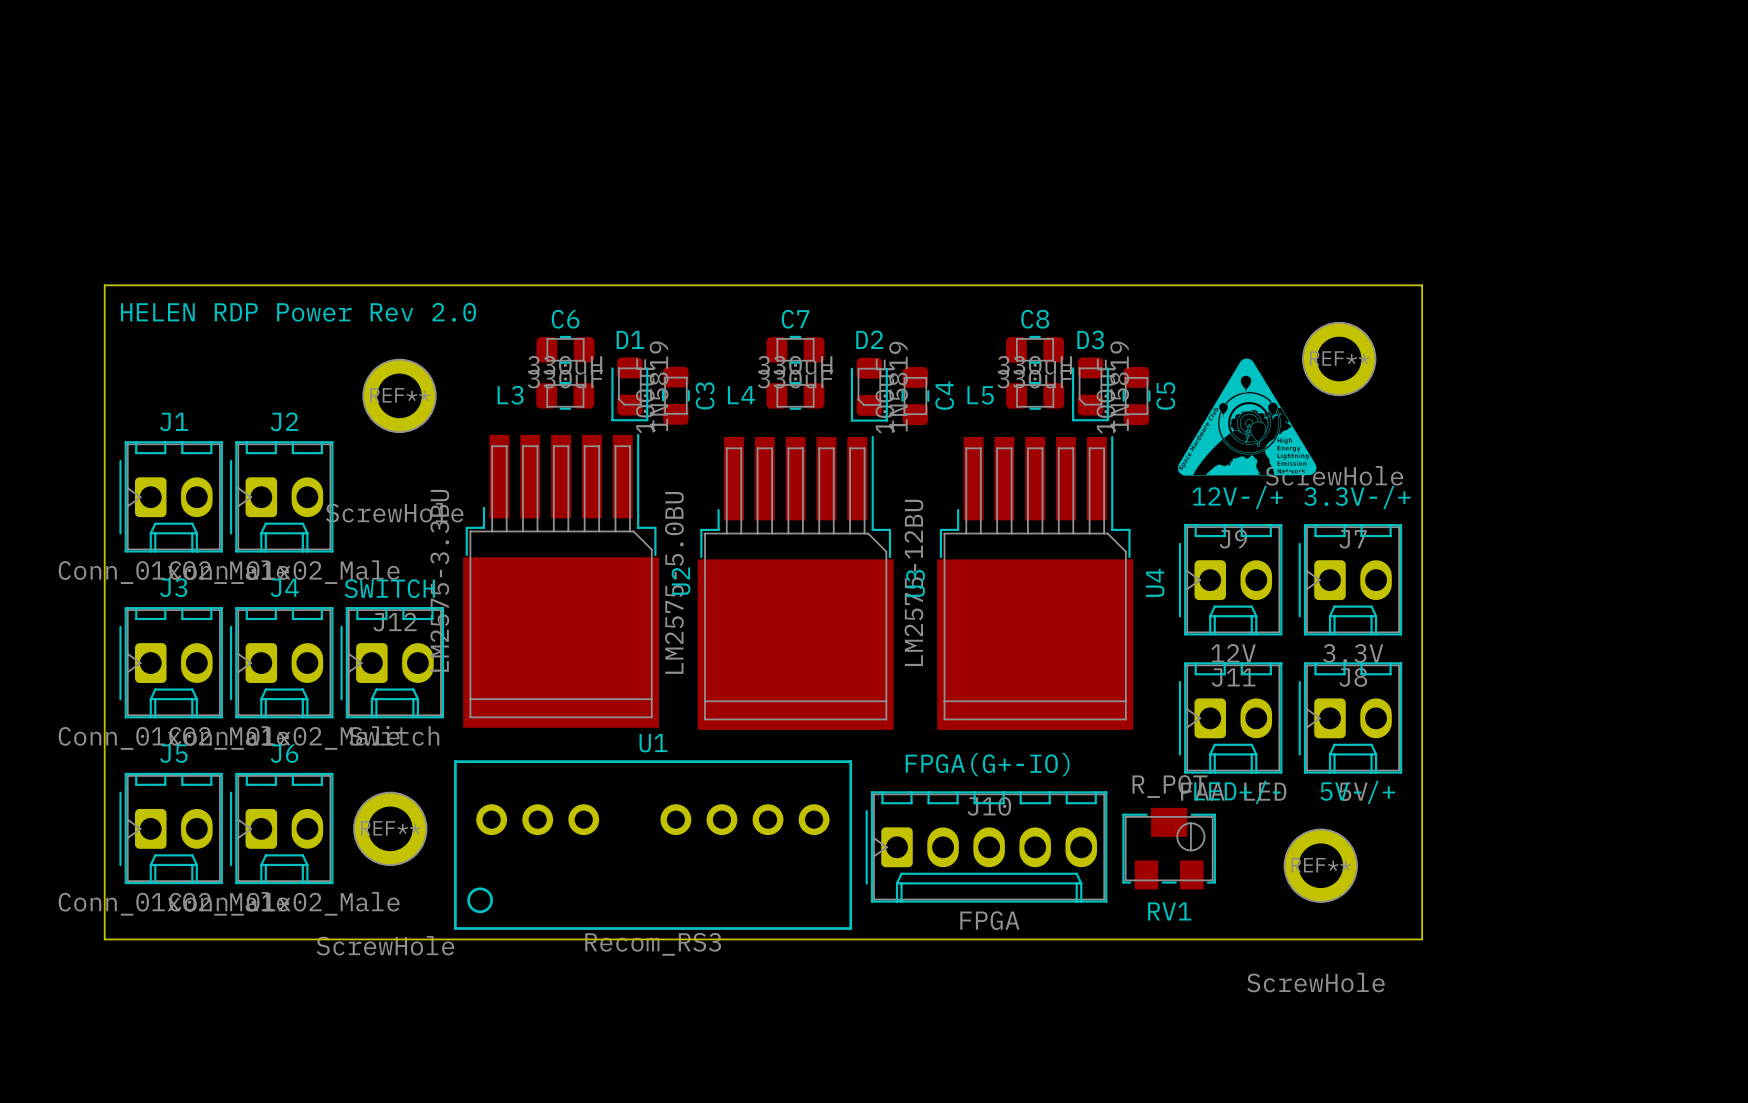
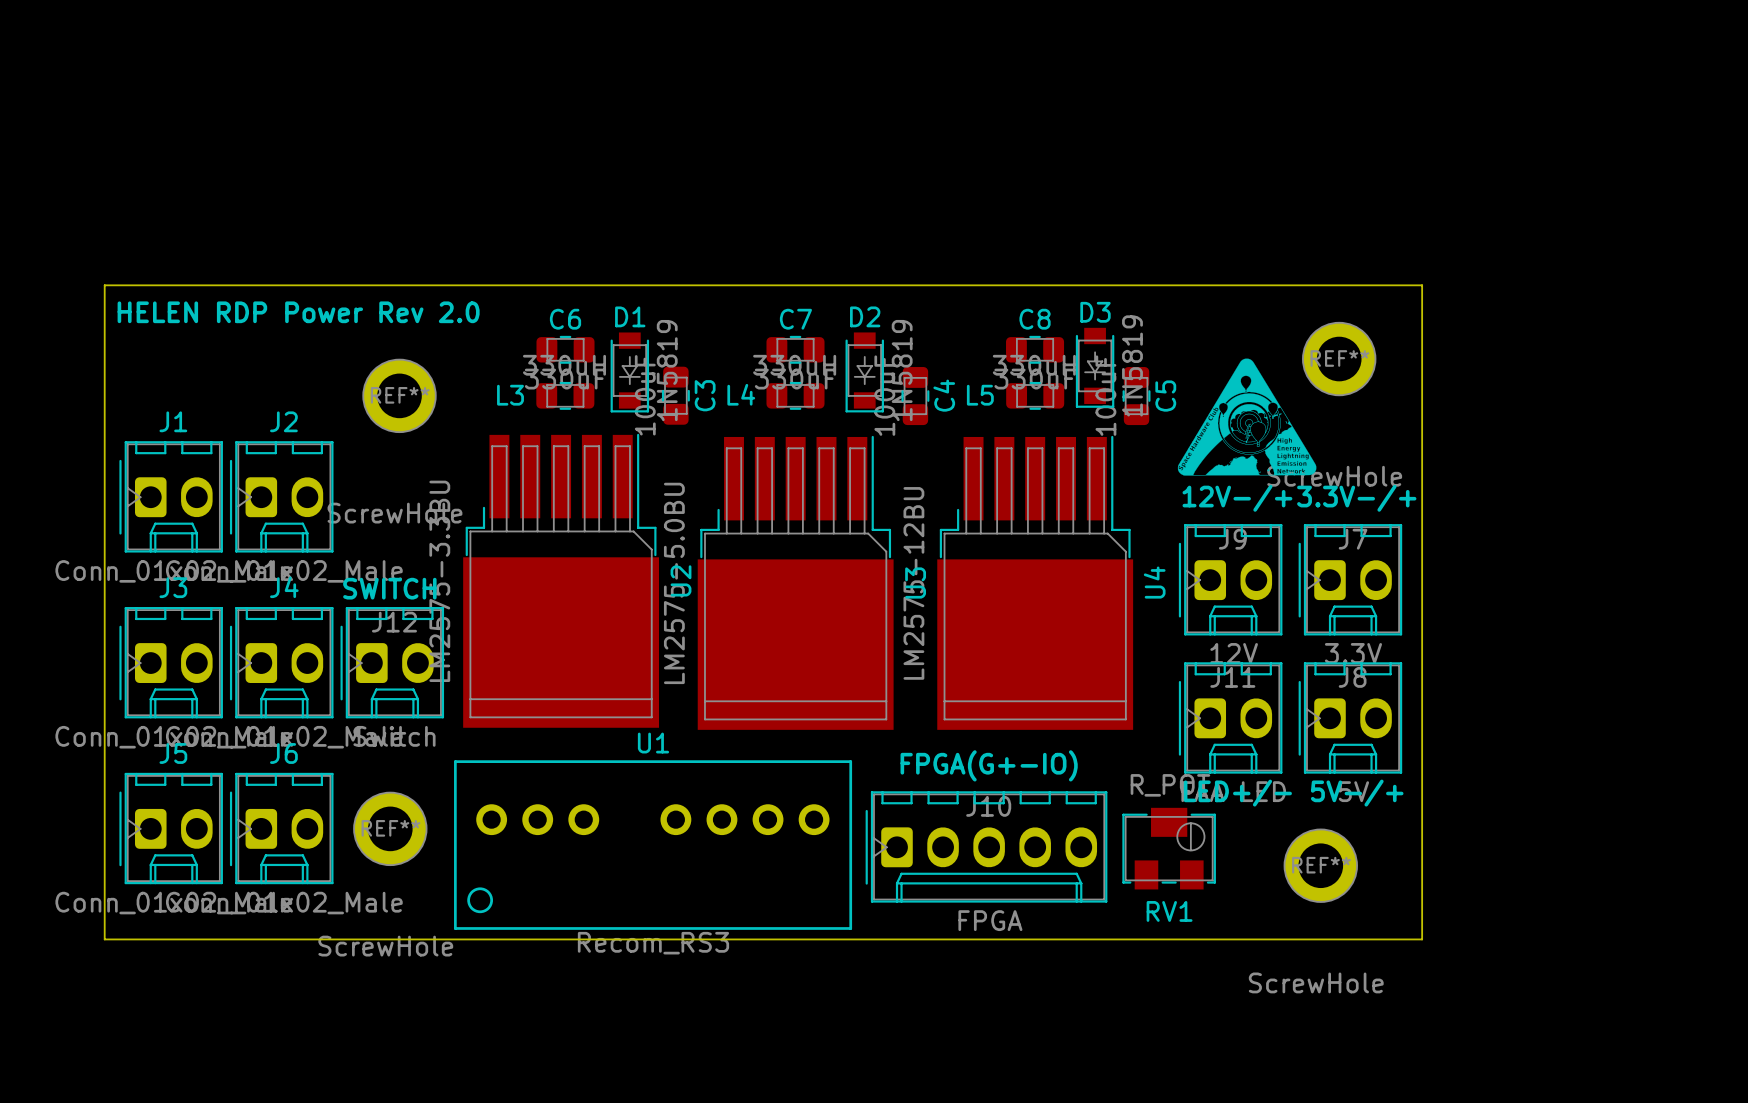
D1 footprint: [611, 357, 649, 422] -> [610, 332, 650, 413]
D2 footprint: [850, 357, 888, 422] -> [845, 332, 884, 413]
D3 footprint: [1071, 357, 1109, 422] -> [1075, 327, 1115, 408]

